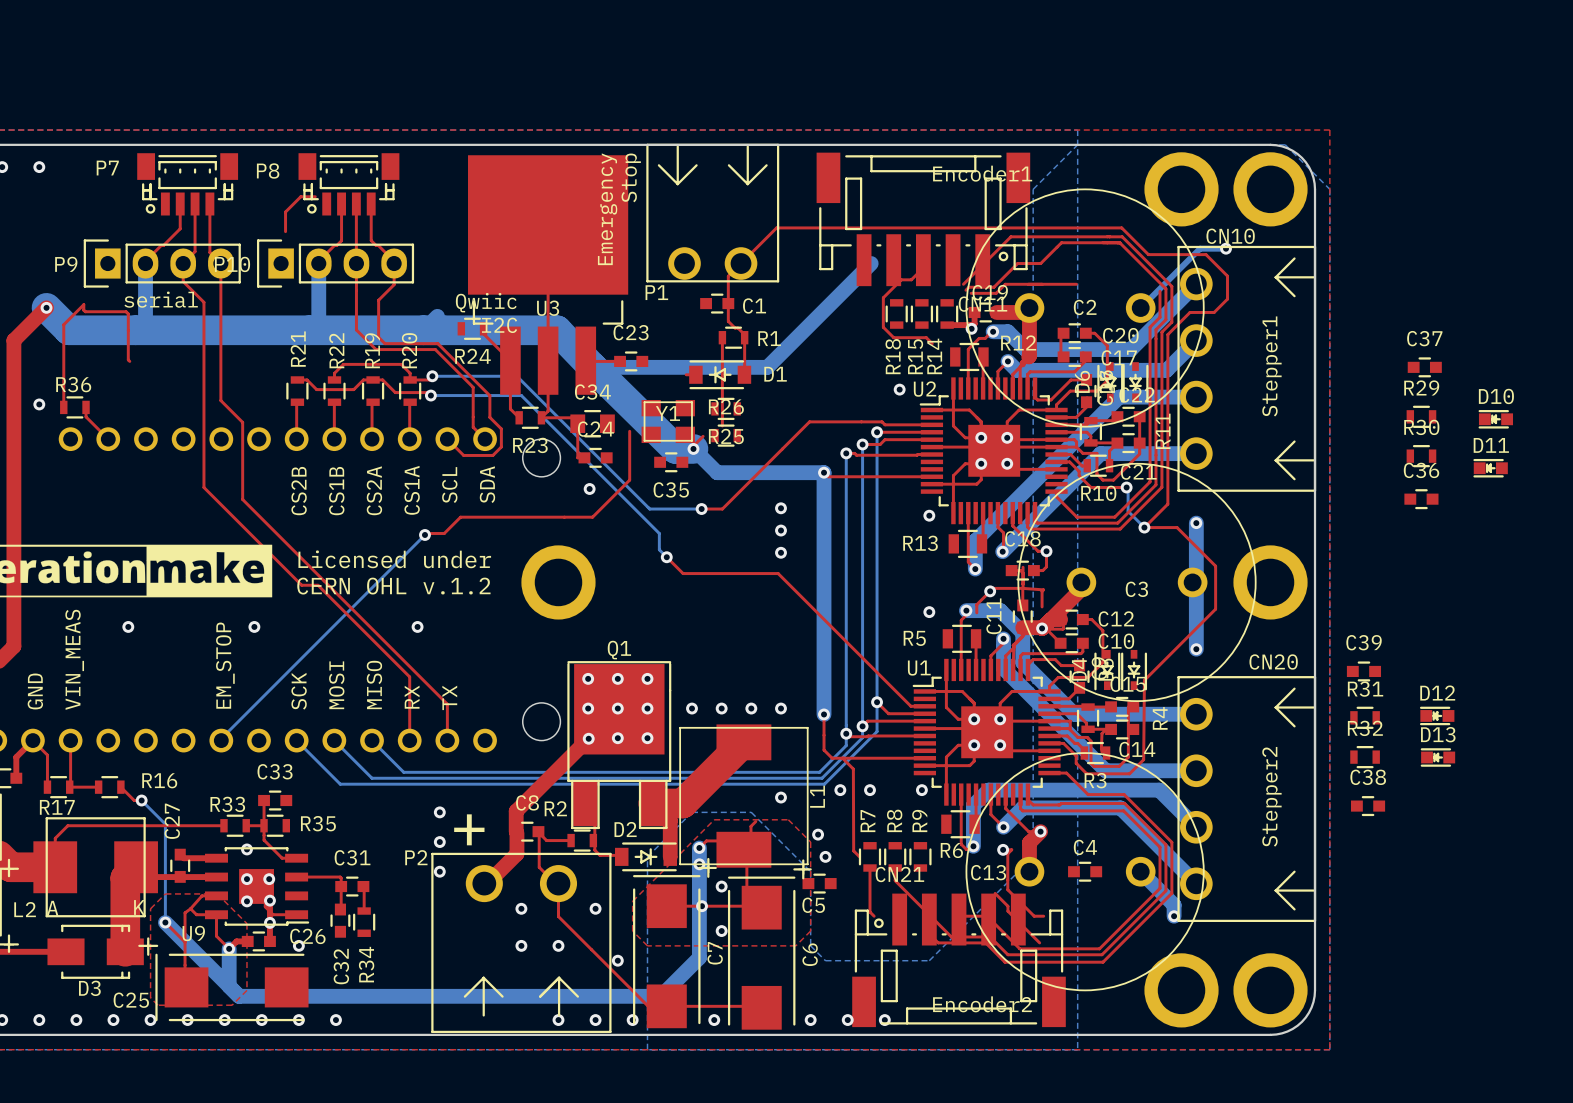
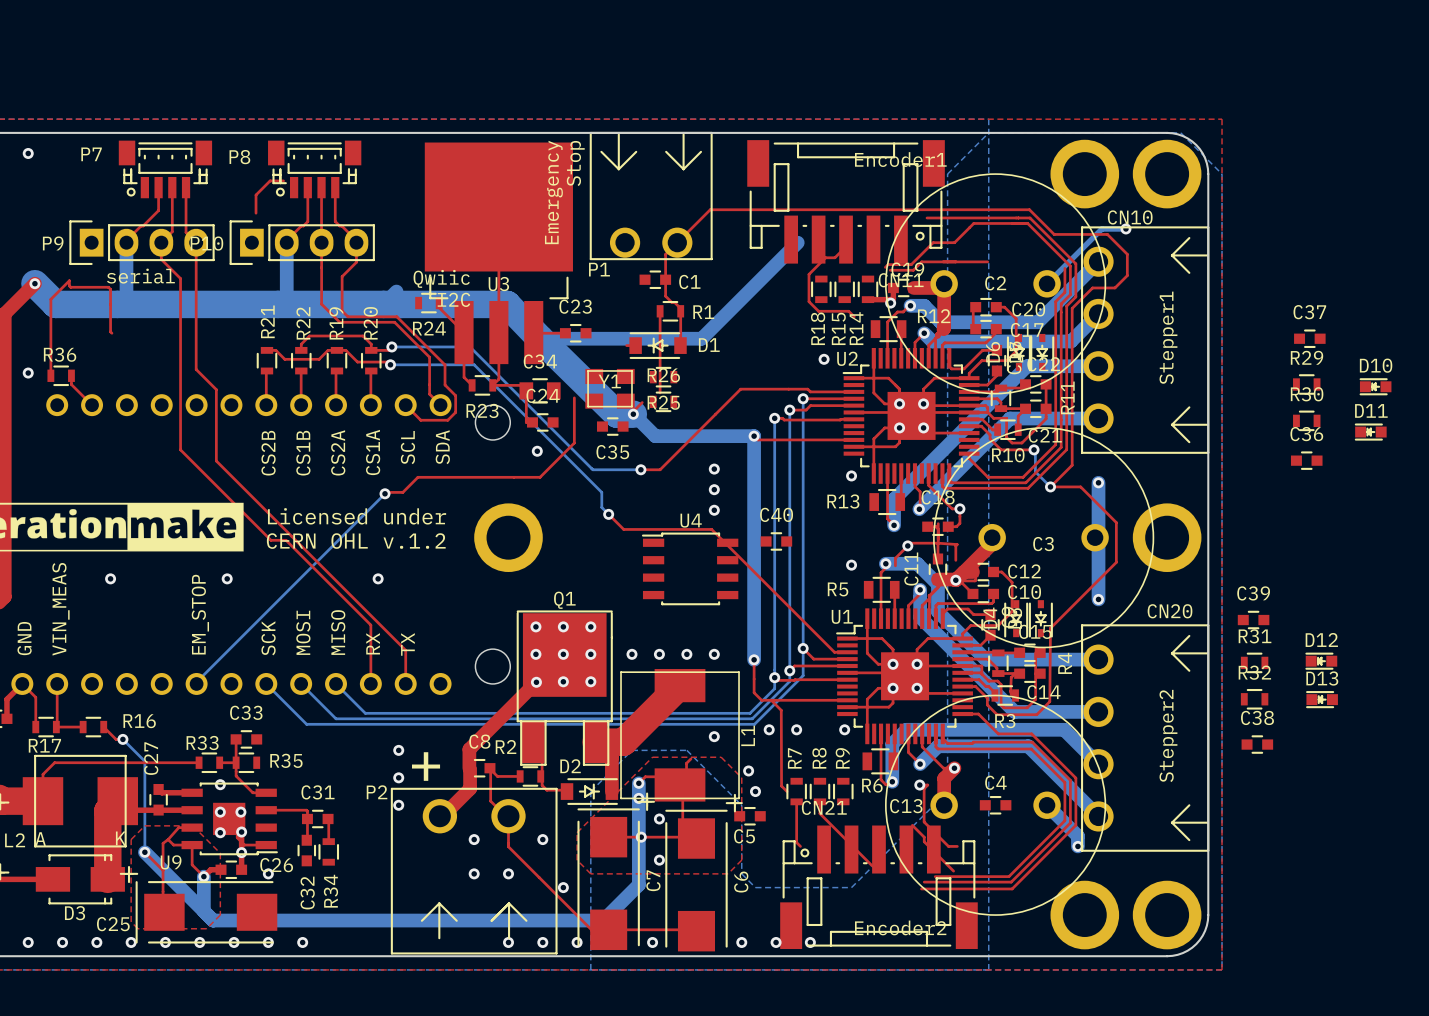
top track: (1010, 236) (963, 284) -> none
C40: none -> (776, 541)
U4: none -> (690, 568)
top track: (961, 916) (987, 916) (1019, 948) -> none
top track: (932, 936) (938, 942) (985, 942) (1004, 962) -> none
top track: (951, 936) (990, 936) (1007, 954) -> none

